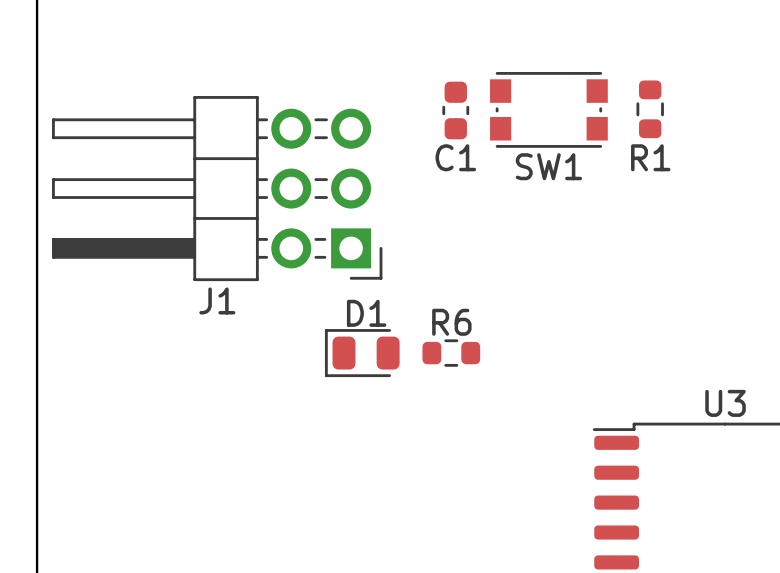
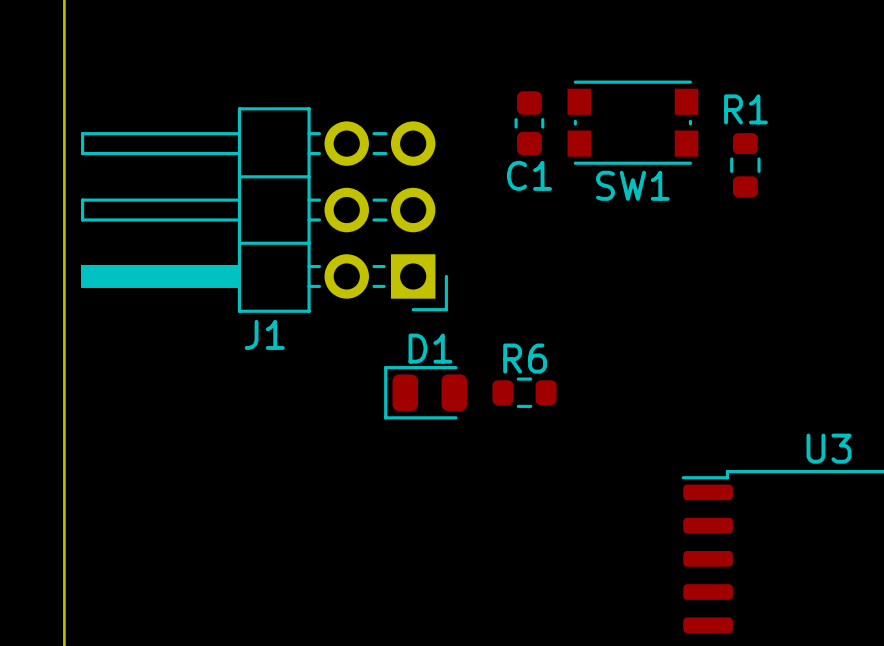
R1 position: (650, 109) -> (745, 165)
R1 name position: R1 (650, 157) -> R1 (745, 109)

